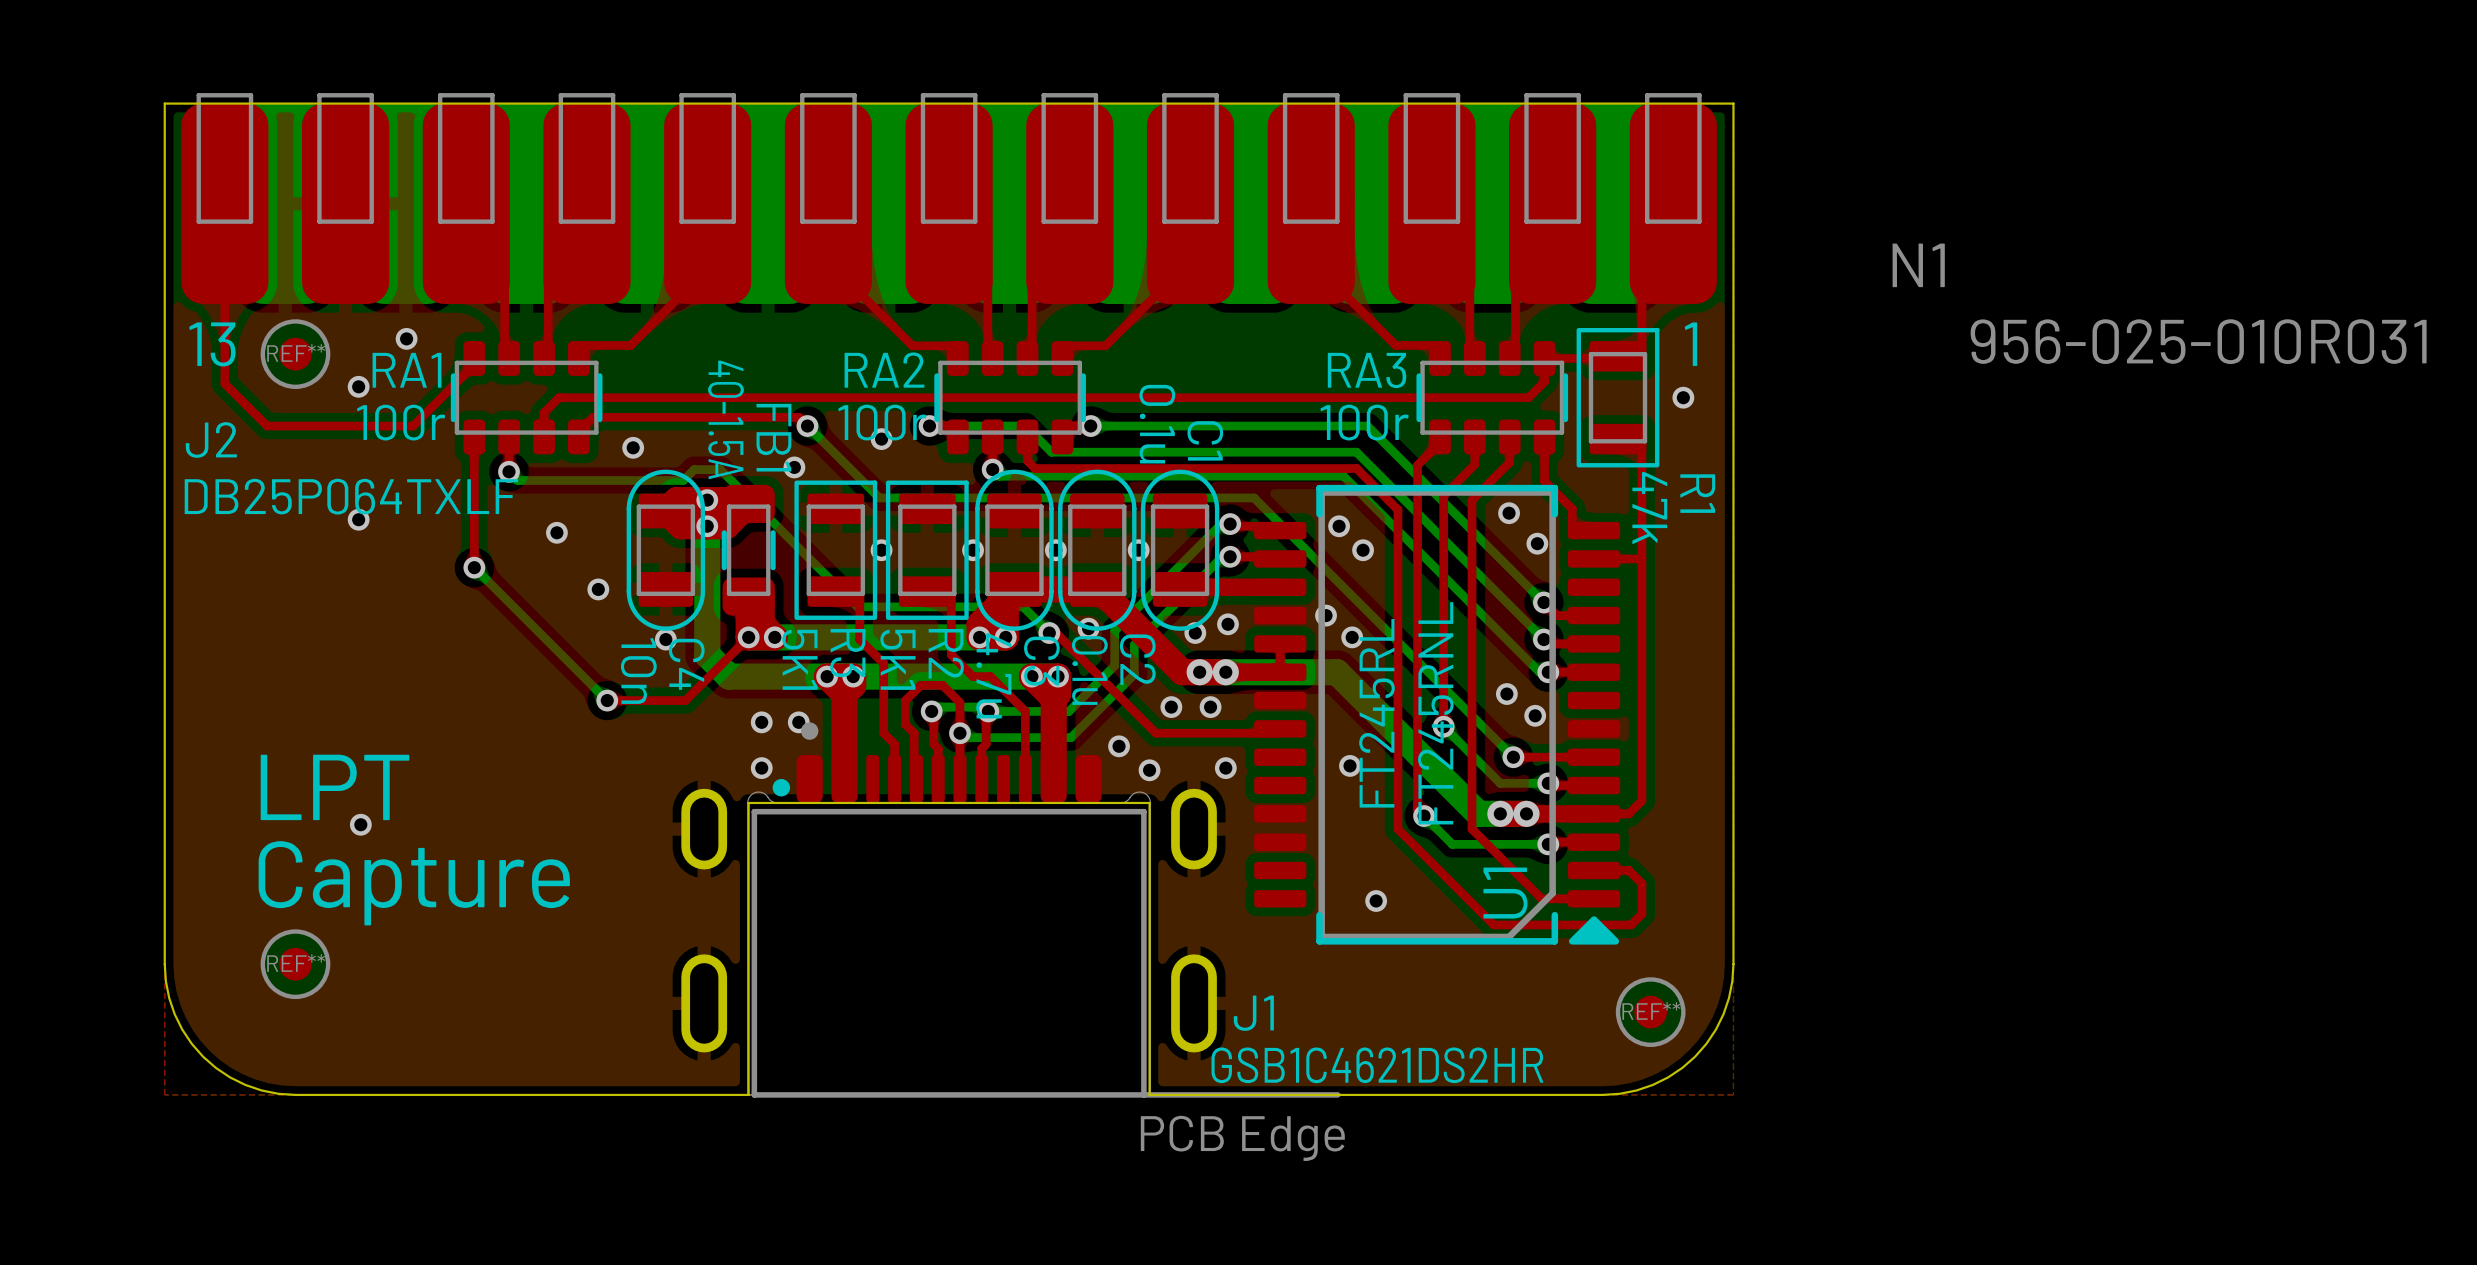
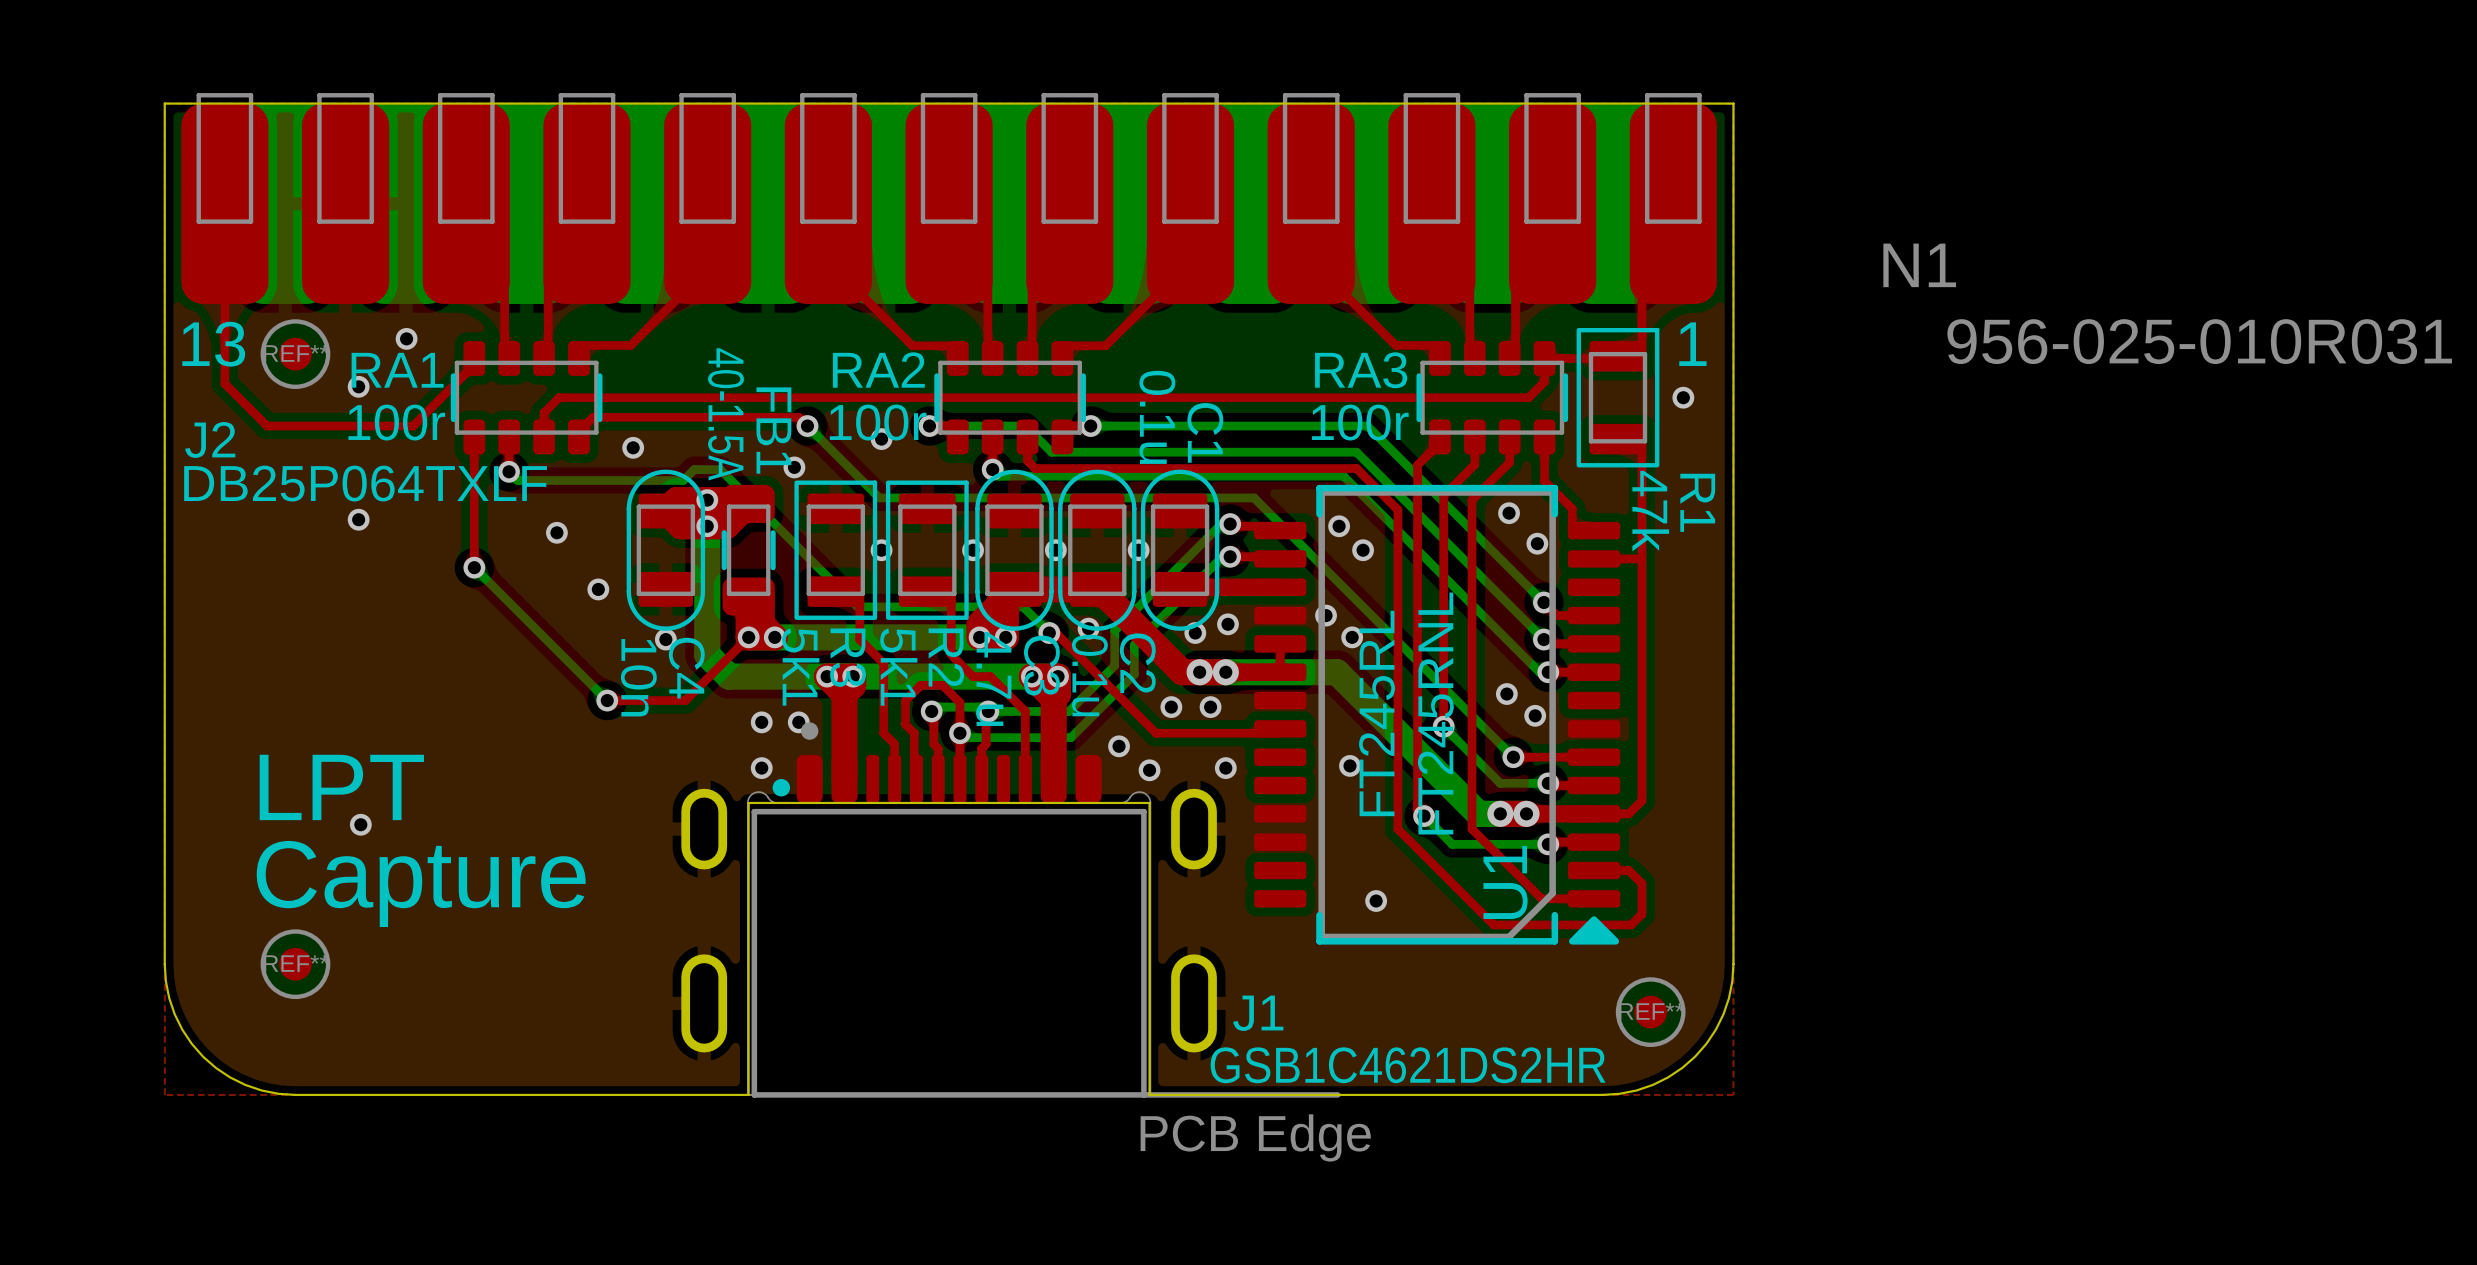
J2 value position: DB25P064TXLF (351, 496) -> DB25P064TXLF (365, 483)

